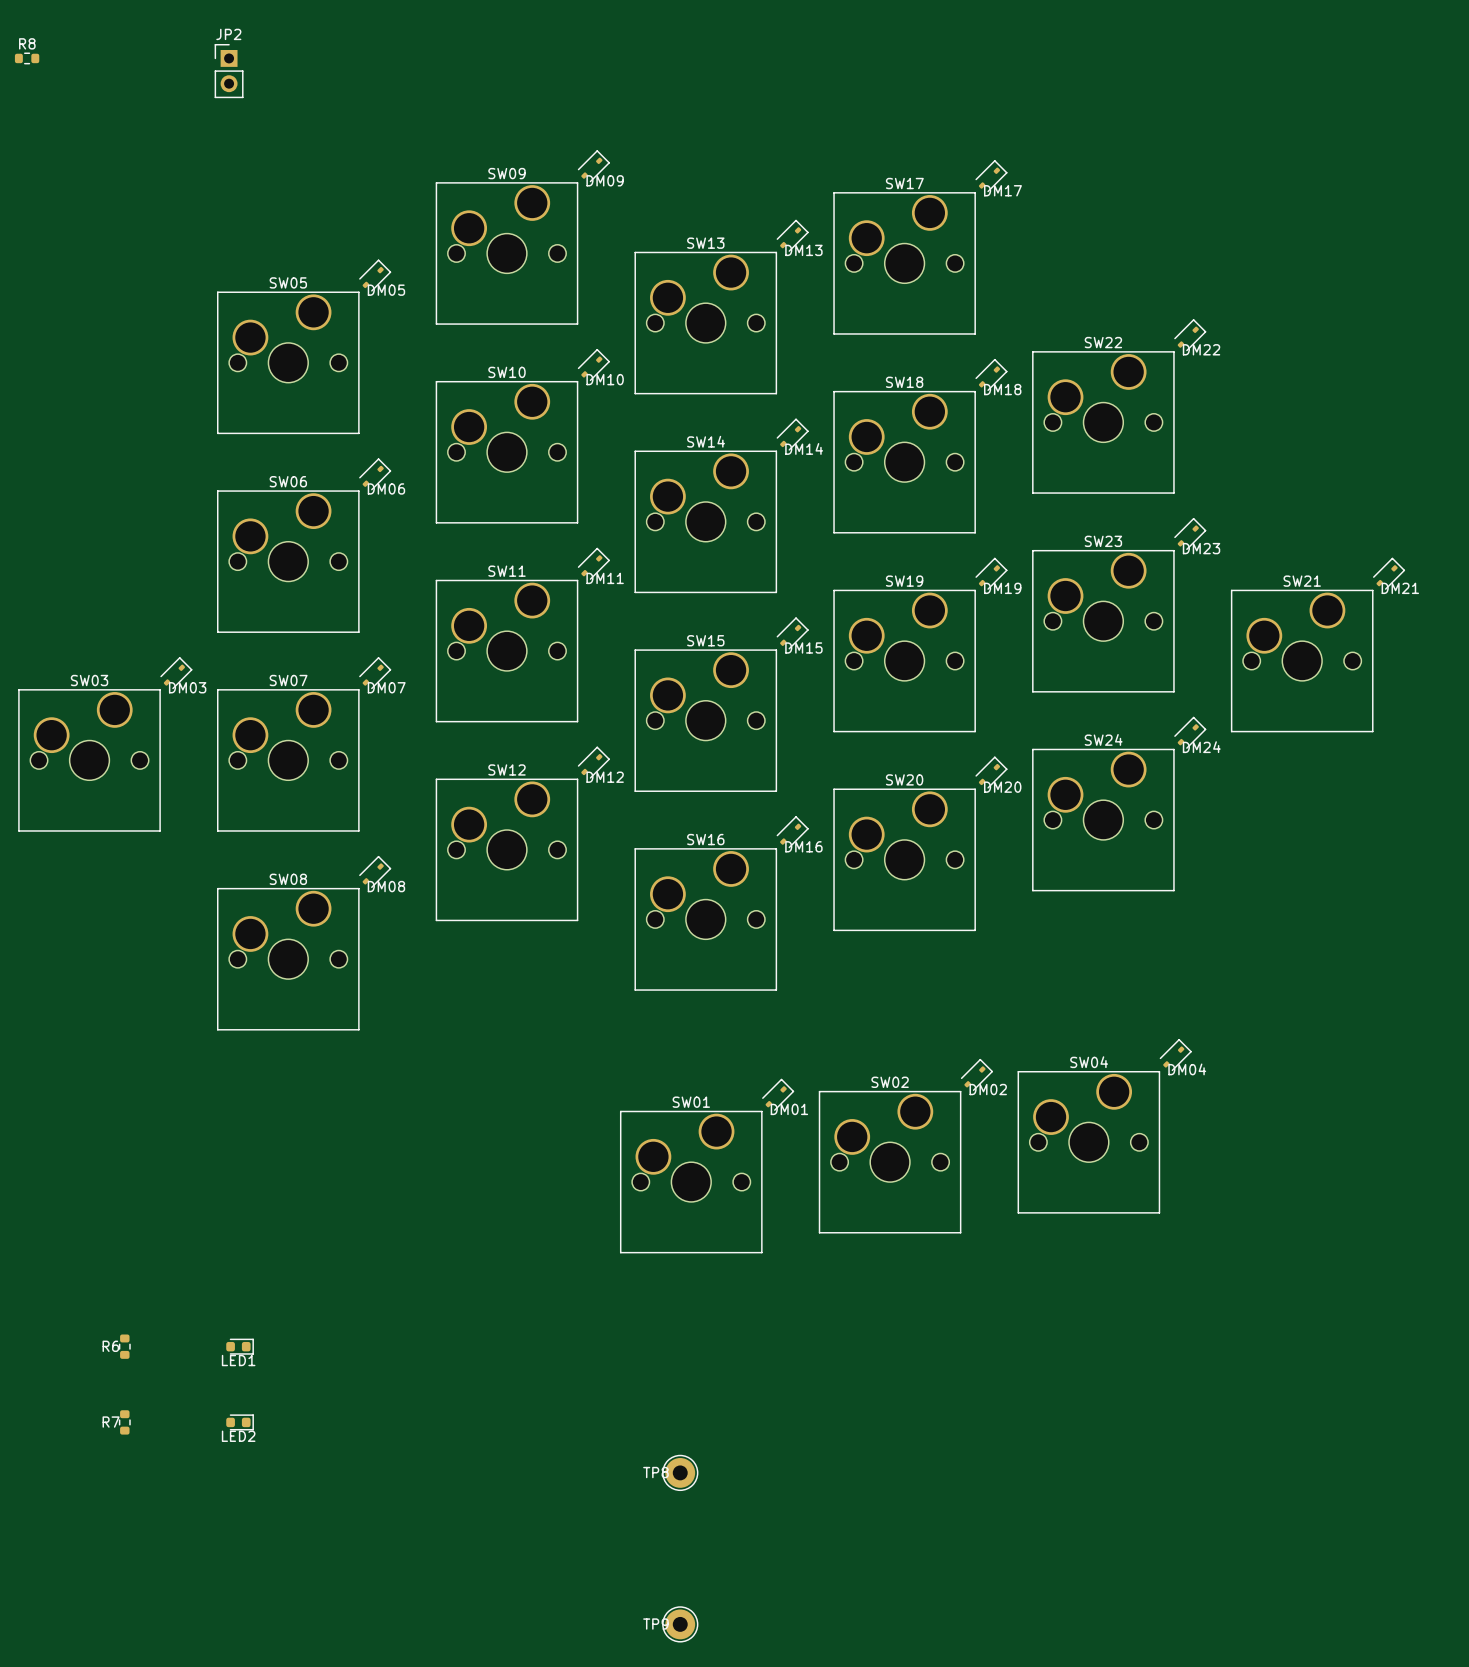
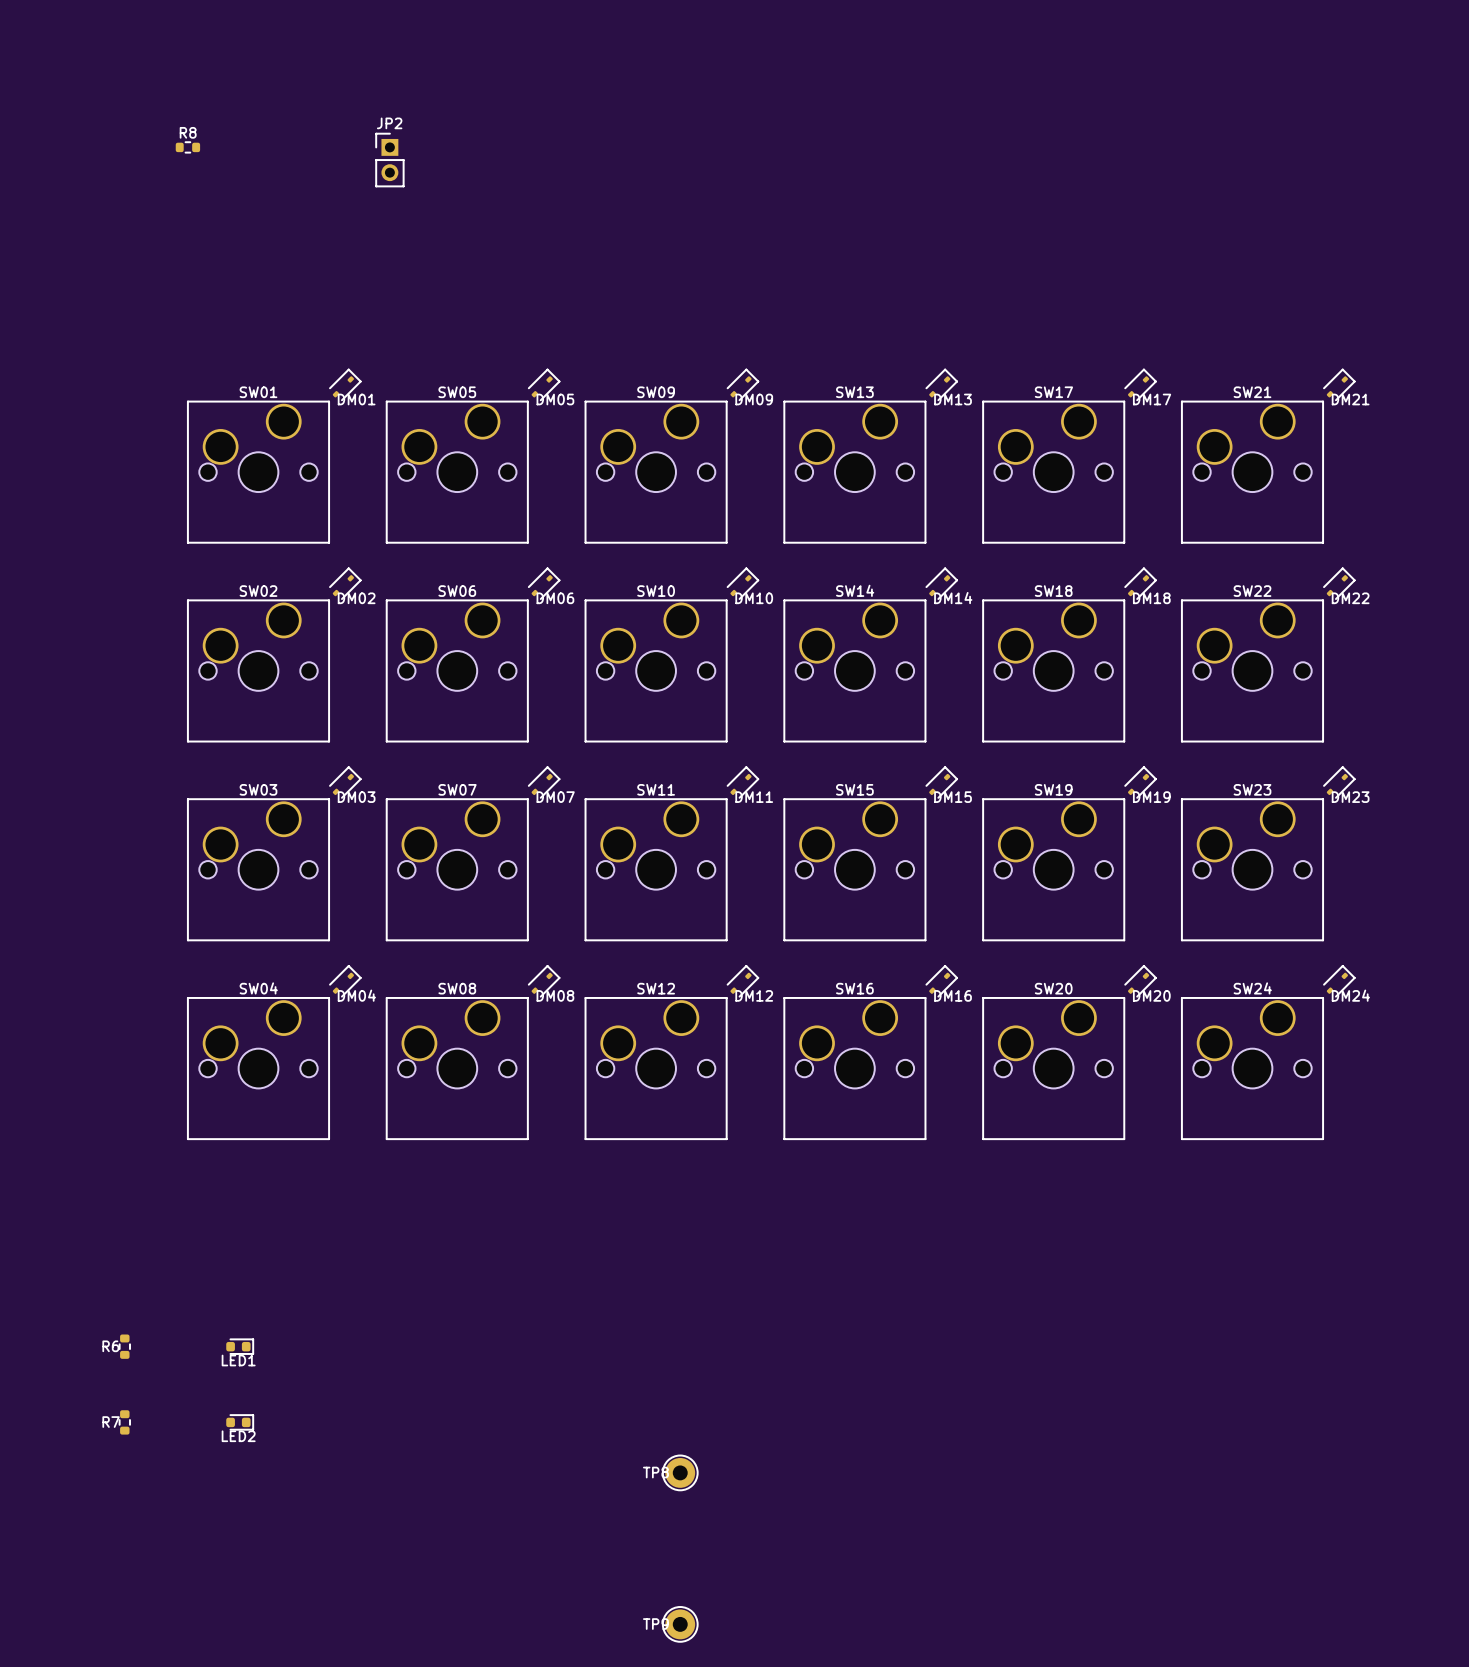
R8 position: (27, 58) -> (187, 147)
JP2 position: (229, 71) -> (389, 160)
DM09 position: (593, 166) -> (742, 384)
DM17 position: (991, 176) -> (1140, 384)
DM13 position: (792, 235) -> (941, 384)
SW09 position: (506, 253) -> (656, 472)
SW17 position: (904, 263) -> (1053, 472)
DM05 position: (375, 275) -> (544, 384)
SW13 position: (705, 323) -> (854, 472)
DM22 position: (1190, 335) -> (1339, 583)
SW05 position: (288, 362) -> (457, 472)
DM10 position: (593, 365) -> (742, 583)
DM18 position: (991, 374) -> (1140, 583)
SW22 position: (1103, 422) -> (1252, 670)
DM14 position: (792, 434) -> (941, 583)
SW10 position: (506, 452) -> (656, 670)
SW18 position: (904, 462) -> (1053, 670)
DM06 position: (375, 474) -> (544, 583)
SW14 position: (705, 521) -> (854, 670)
DM23 position: (1190, 534) -> (1339, 782)
SW06 position: (288, 561) -> (457, 670)
DM11 position: (593, 563) -> (742, 782)
DM19 position: (991, 573) -> (1140, 782)
DM21 position: (1389, 573) -> (1339, 384)
SW23 position: (1103, 621) -> (1252, 869)
DM15 position: (792, 633) -> (941, 782)
SW11 position: (506, 651) -> (656, 869)
SW19 position: (904, 661) -> (1053, 869)
SW21 position: (1302, 661) -> (1252, 472)
DM03 position: (176, 673) -> (345, 782)
DM07 position: (375, 673) -> (544, 782)
SW15 position: (705, 720) -> (854, 869)
DM24 position: (1190, 732) -> (1339, 981)
SW03 position: (89, 760) -> (258, 869)
SW07 position: (288, 760) -> (457, 869)
DM12 position: (593, 762) -> (742, 981)
DM20 position: (991, 772) -> (1140, 981)
SW24 position: (1103, 820) -> (1252, 1068)
DM16 position: (792, 832) -> (941, 981)
SW12 position: (506, 849) -> (656, 1068)
SW20 position: (904, 859) -> (1053, 1068)
DM08 position: (375, 871) -> (544, 981)
SW16 position: (705, 919) -> (854, 1068)
SW08 position: (288, 959) -> (457, 1068)
DM04 position: (1175, 1055) -> (345, 981)
DM02 position: (976, 1074) -> (345, 583)
DM01 position: (778, 1094) -> (345, 384)
SW04 position: (1088, 1142) -> (258, 1068)
SW02 position: (890, 1162) -> (258, 670)
SW01 position: (691, 1182) -> (258, 472)

